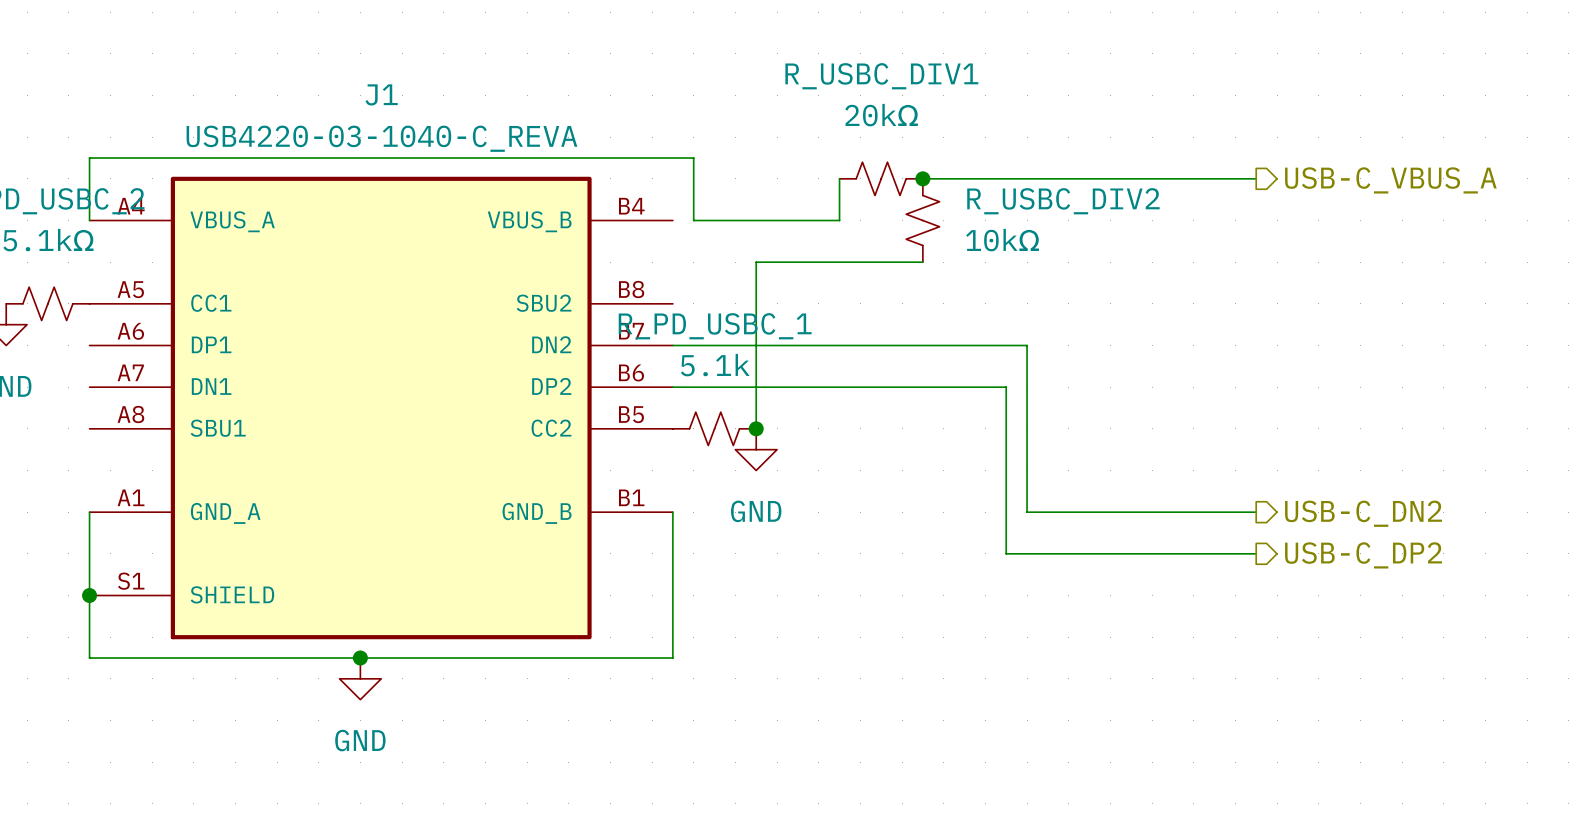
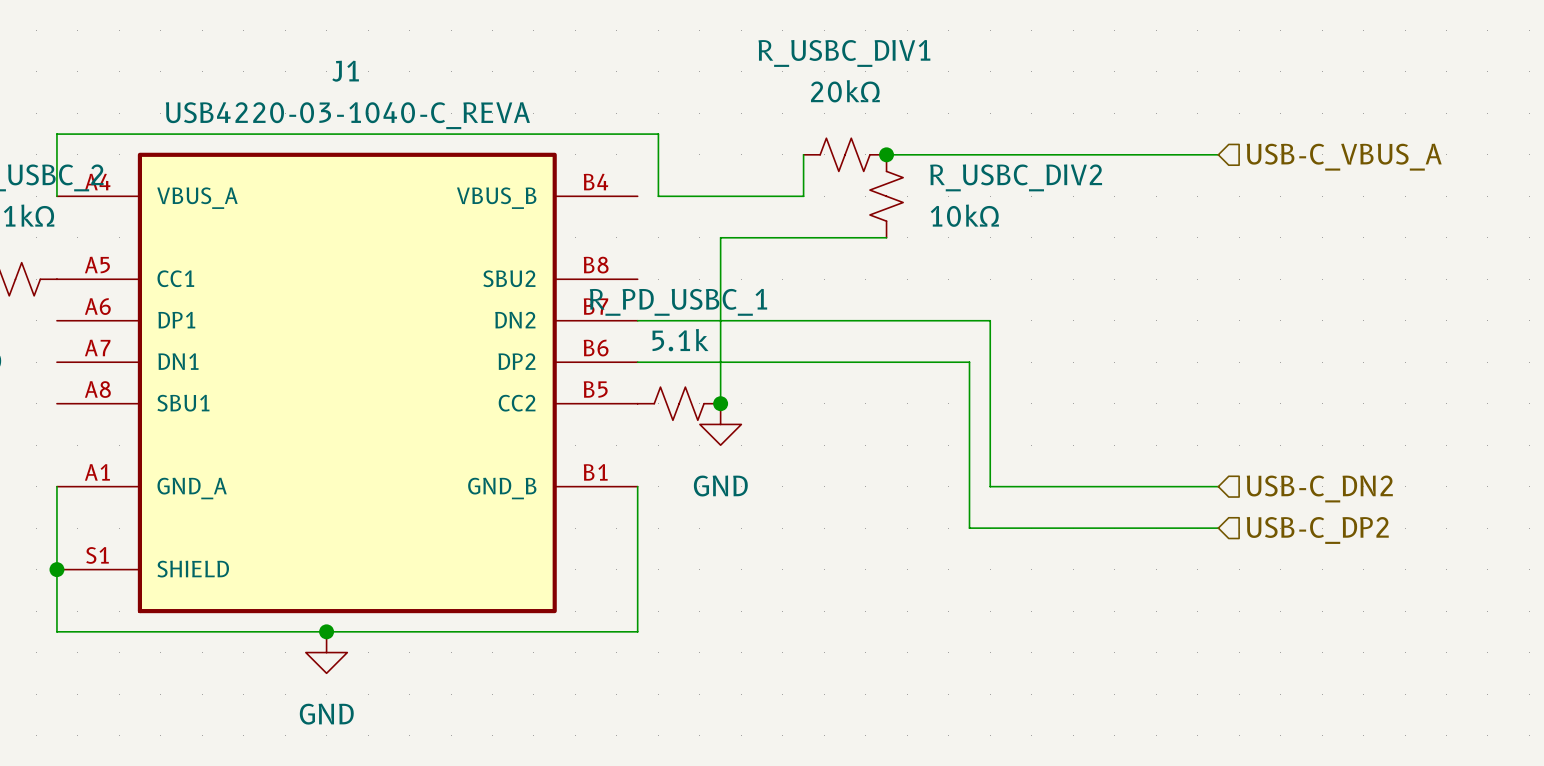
hierarchical label shape: output (1390, 180) -> input (1344, 157)
hierarchical label shape: output (1363, 513) -> input (1319, 488)
hierarchical label shape: output (1363, 555) -> input (1317, 530)

